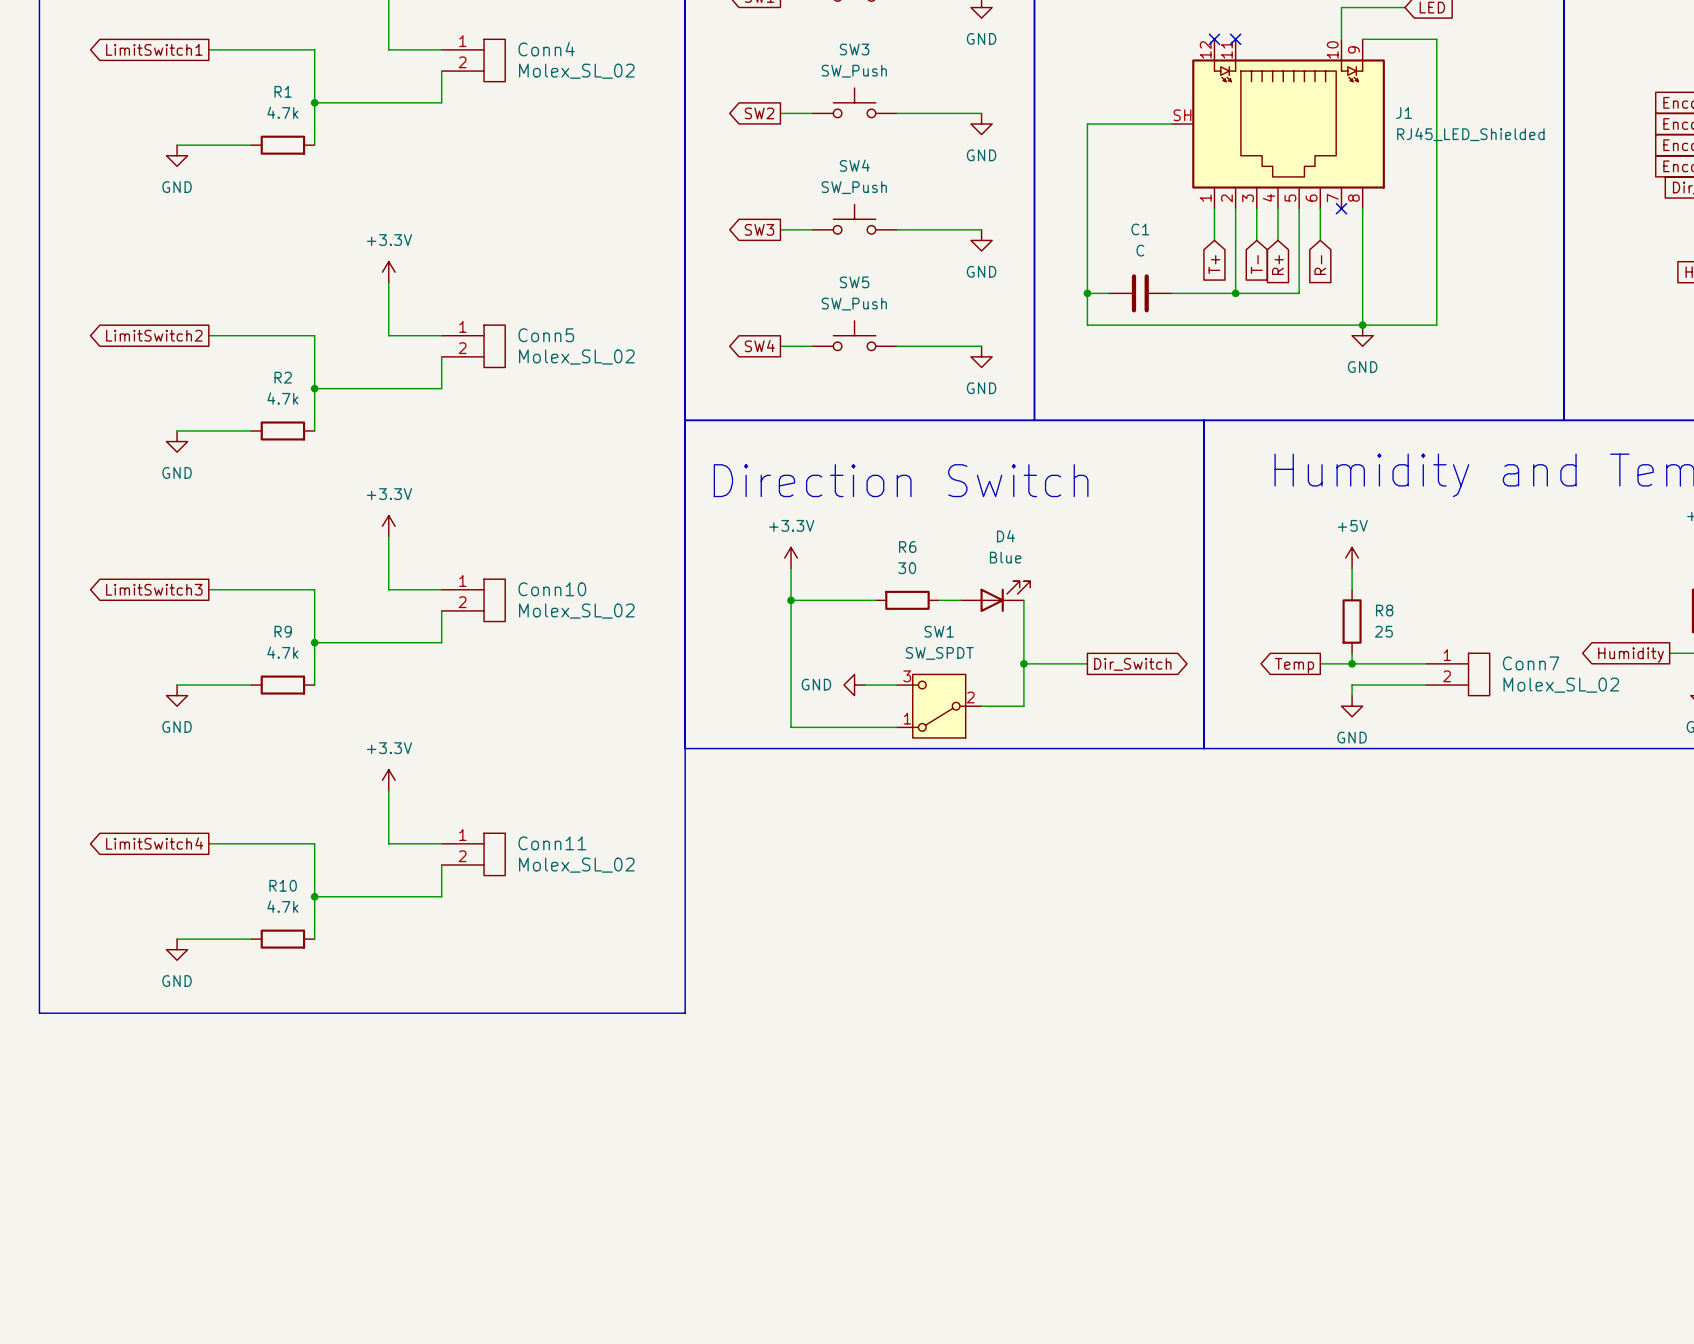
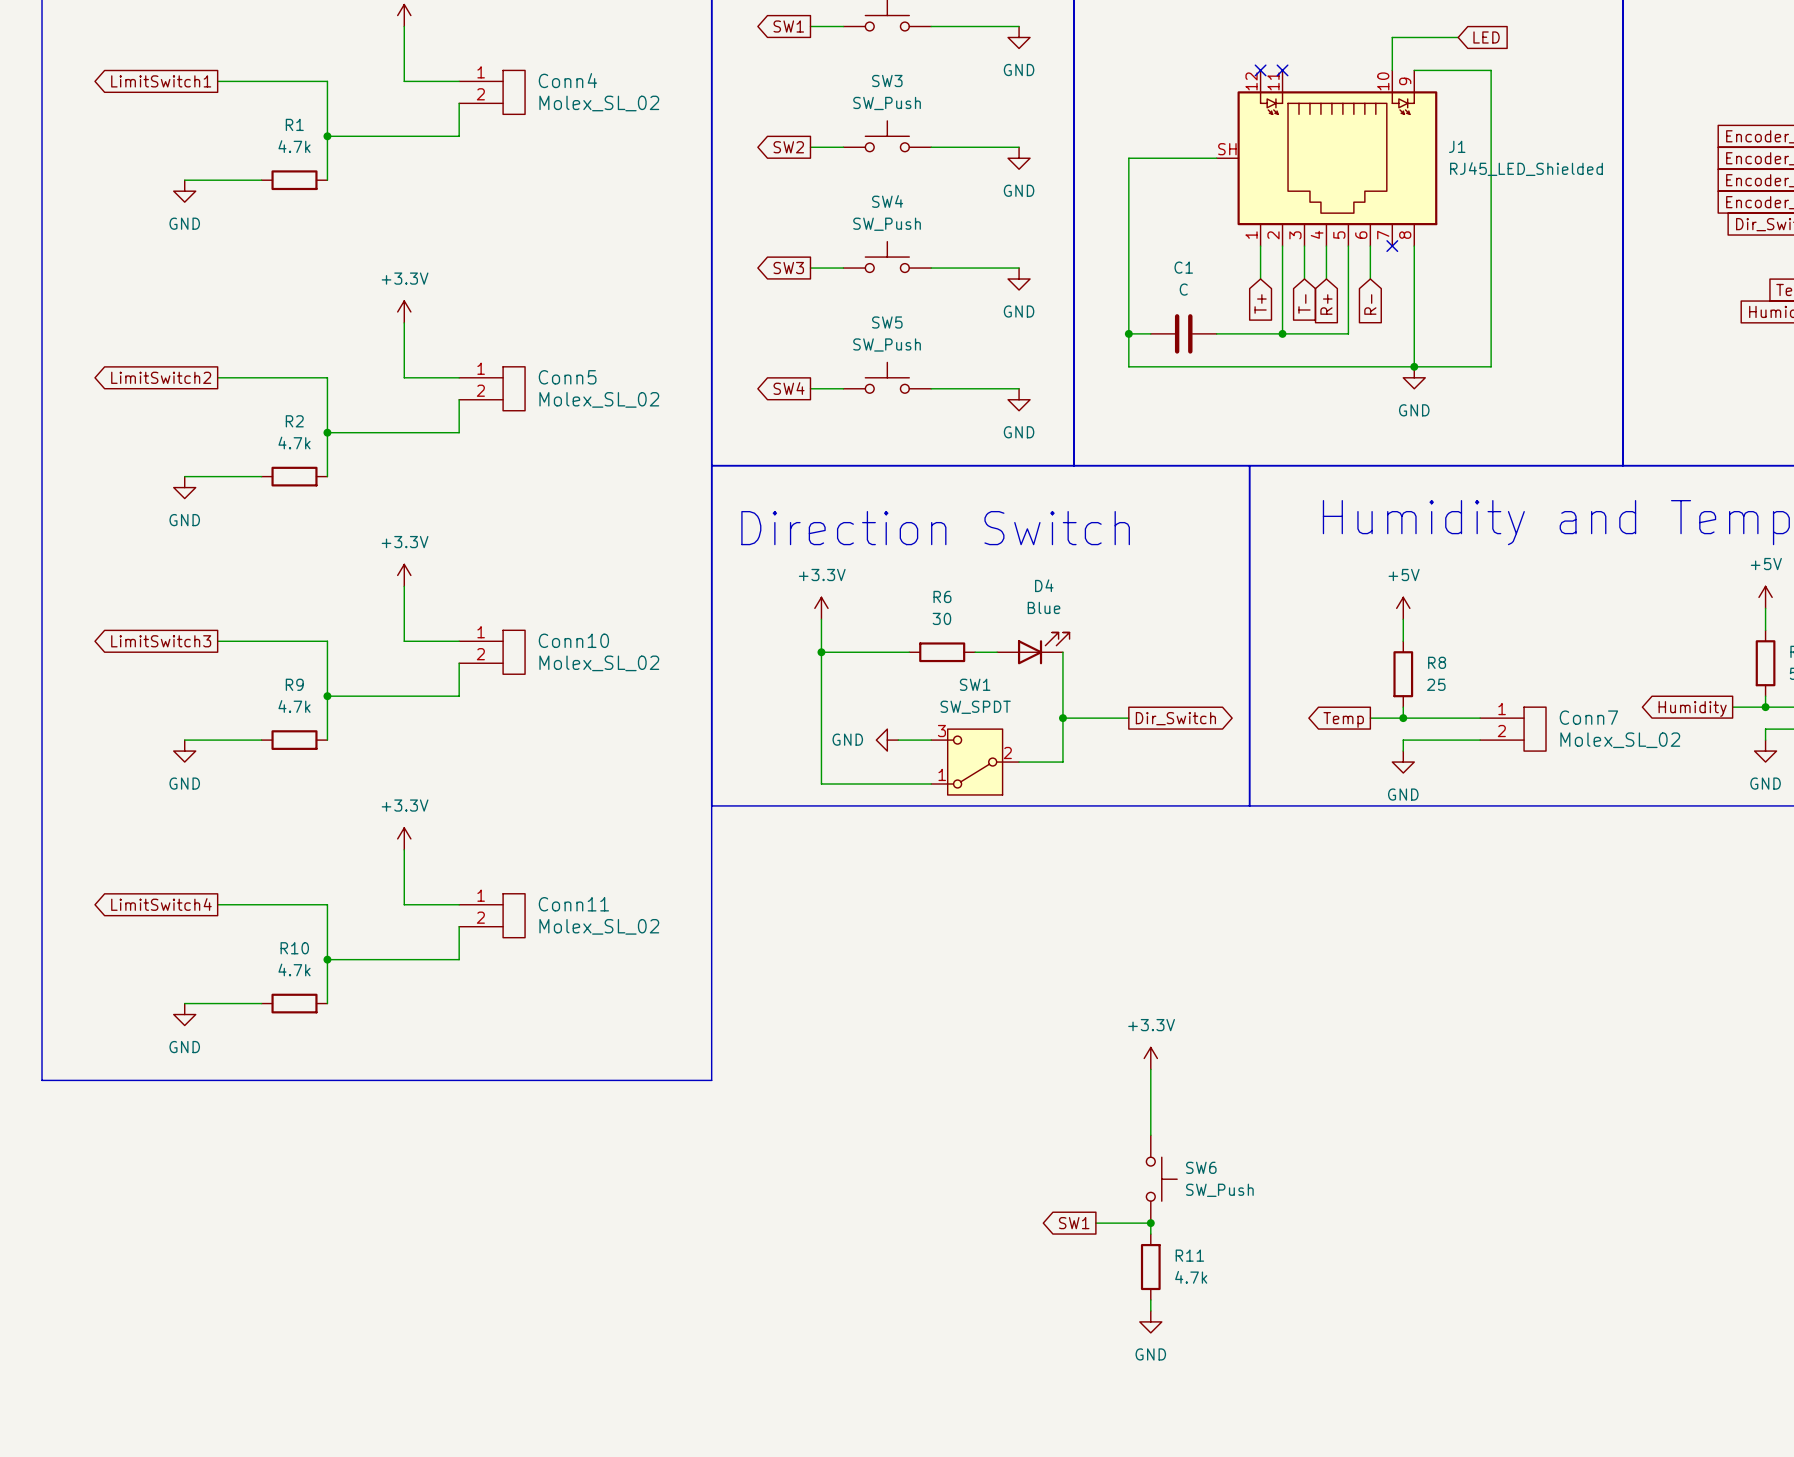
power symbol: none -> +3.3V (1150, 1058)
wire: none -> (1150, 1069) (1150, 1135)
SW6: none -> SW_Push (1161, 1179)
global label: none -> SW1 (1074, 1223)
wire: none -> (1095, 1223) (1150, 1223) (1150, 1234)
junction: none -> (1150, 1223)
R11: none -> 4.7k (1150, 1267)
wire: none -> (1150, 1299) (1150, 1310)
power symbol: none -> GND (1150, 1321)

